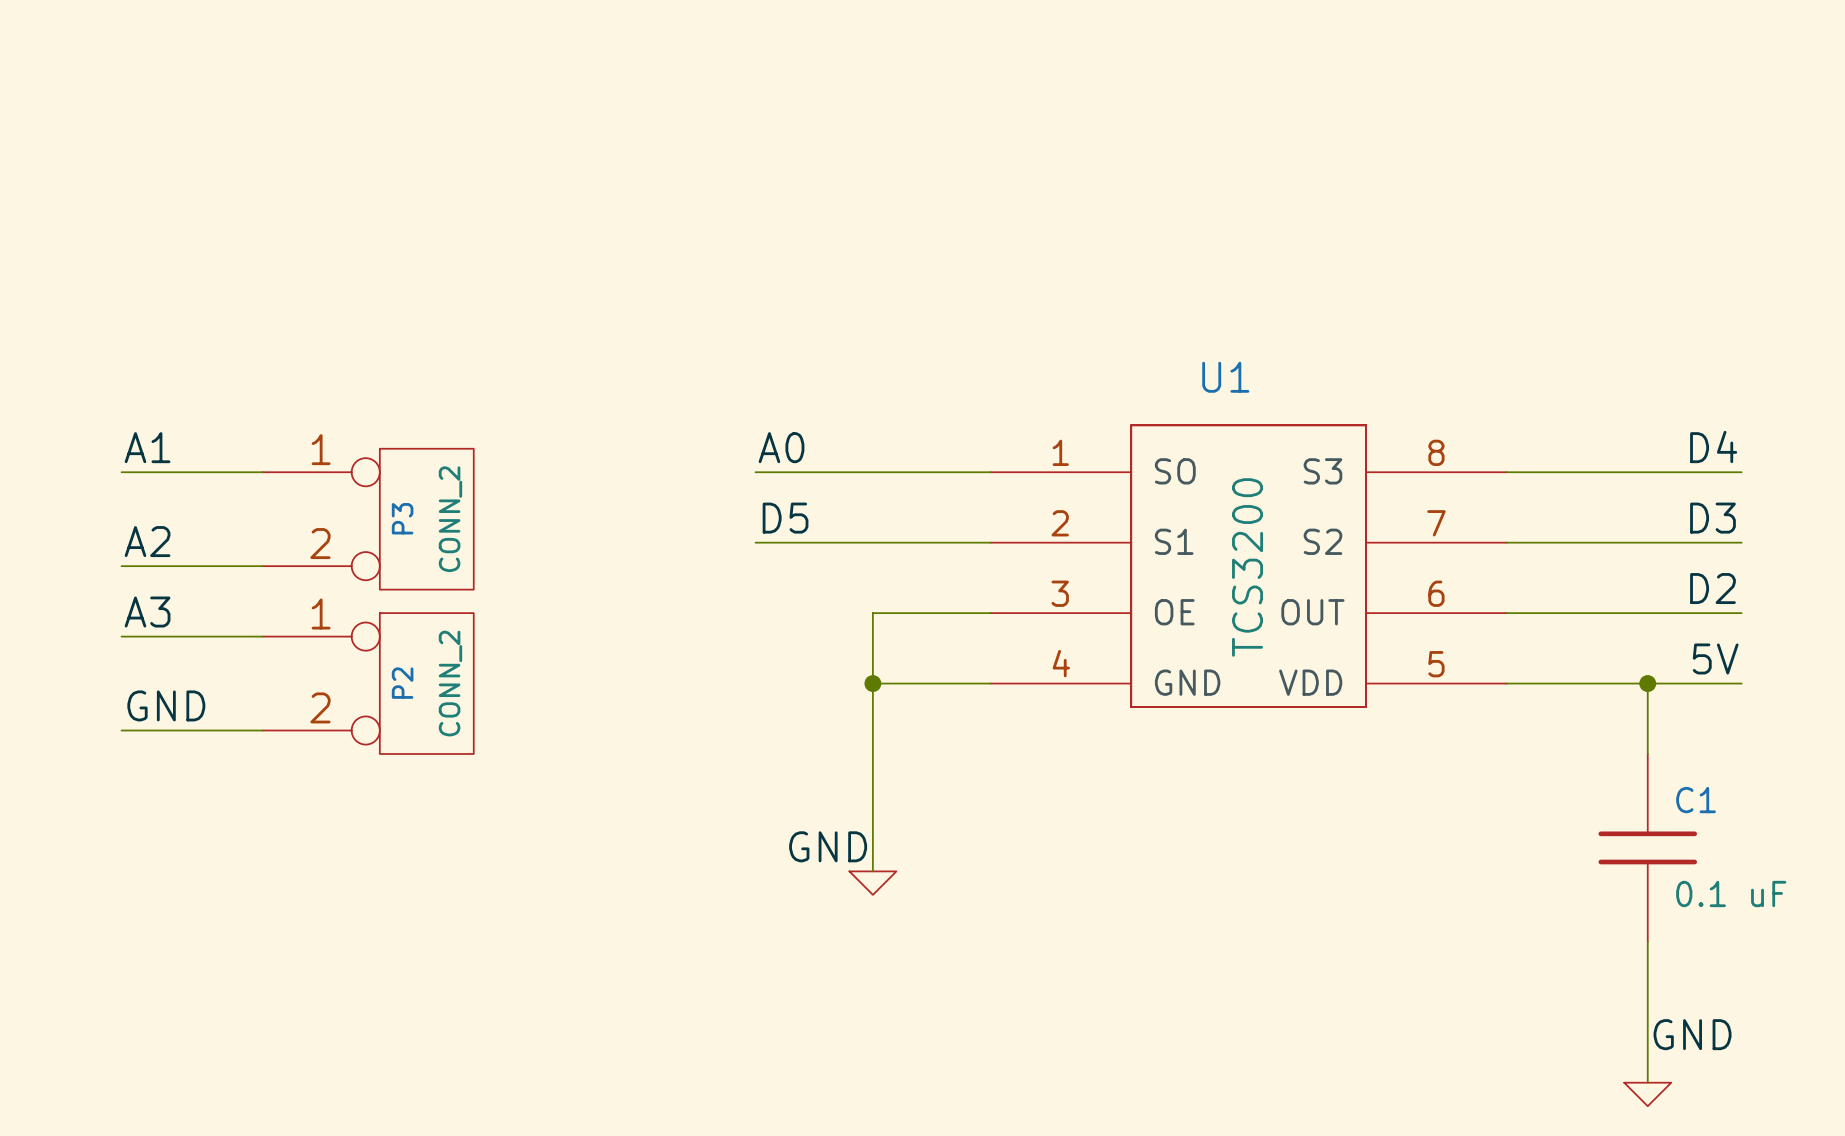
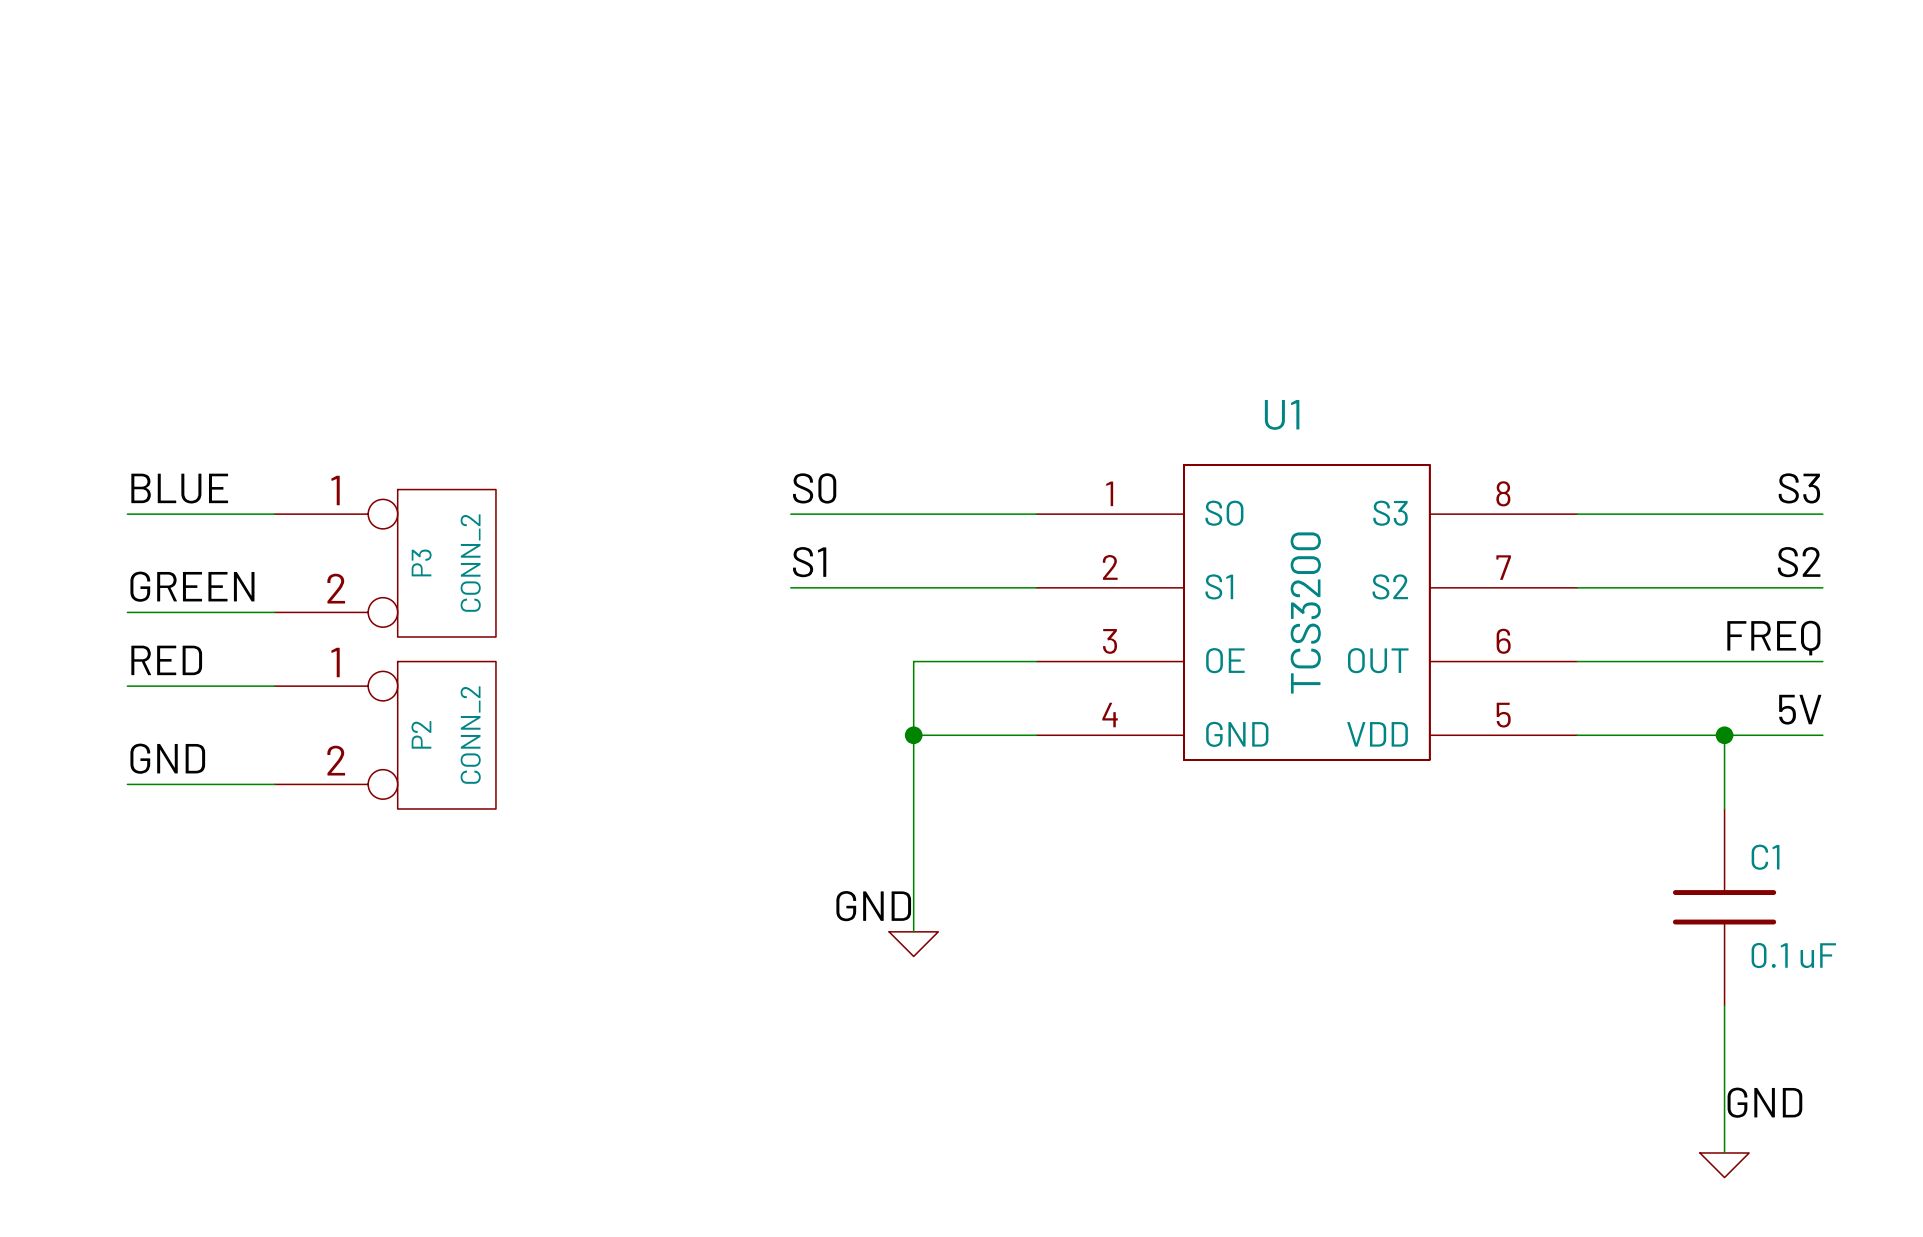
label: D4 (1713, 446) -> S3 (1799, 488)
label: A1 (147, 447) -> BLUE (179, 488)
label: A0 (781, 447) -> S0 (814, 488)
label: D5 (785, 518) -> S1 (809, 562)
label: D3 (1712, 518) -> S2 (1799, 562)
label: A2 (147, 541) -> GREEN (192, 586)
label: D2 (1712, 588) -> FREQ (1773, 638)
label: A3 (147, 612) -> RED (166, 660)

